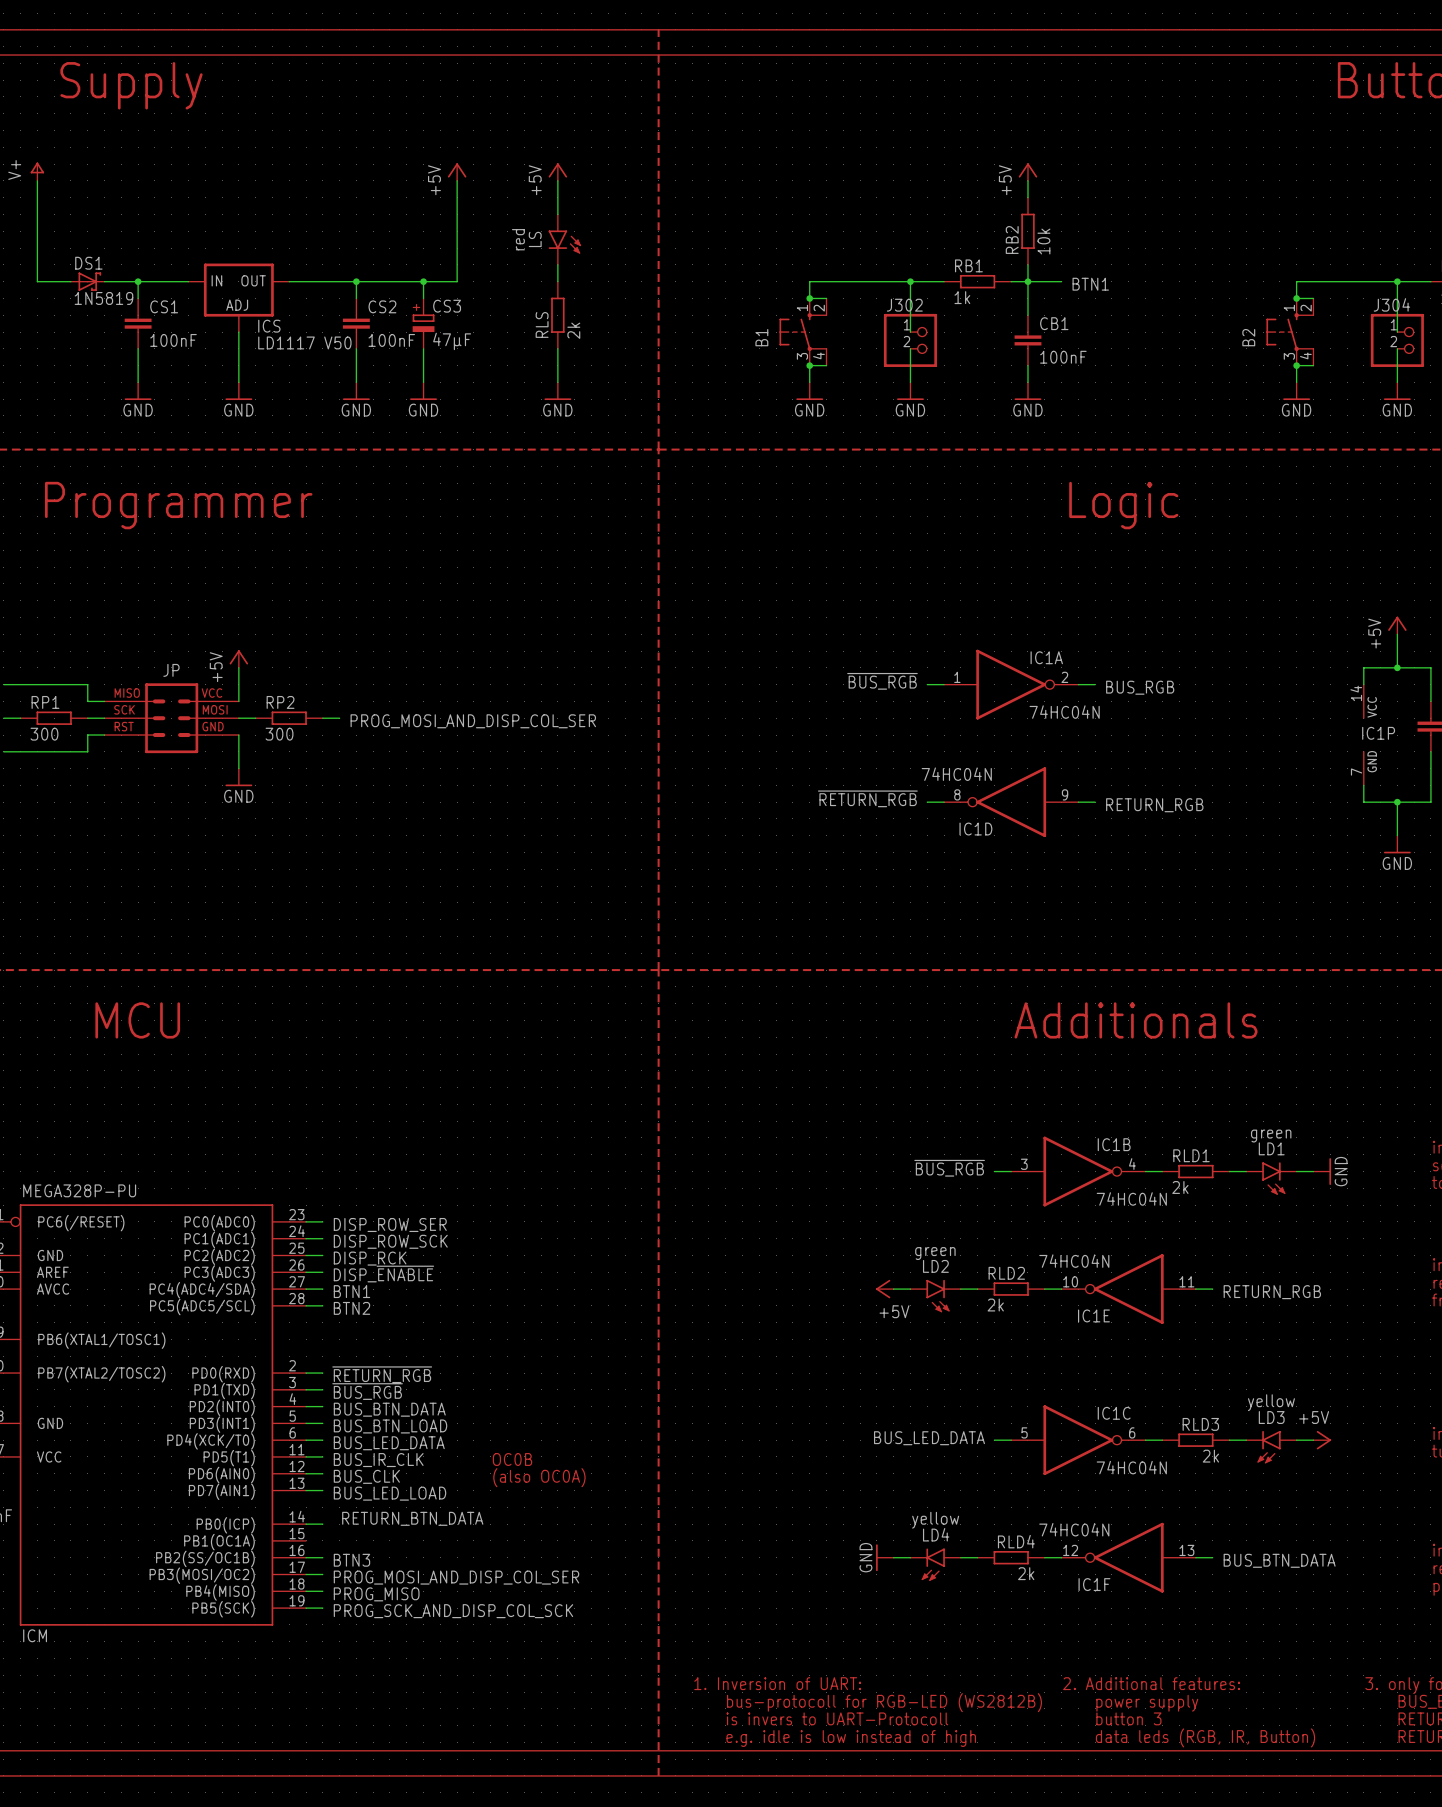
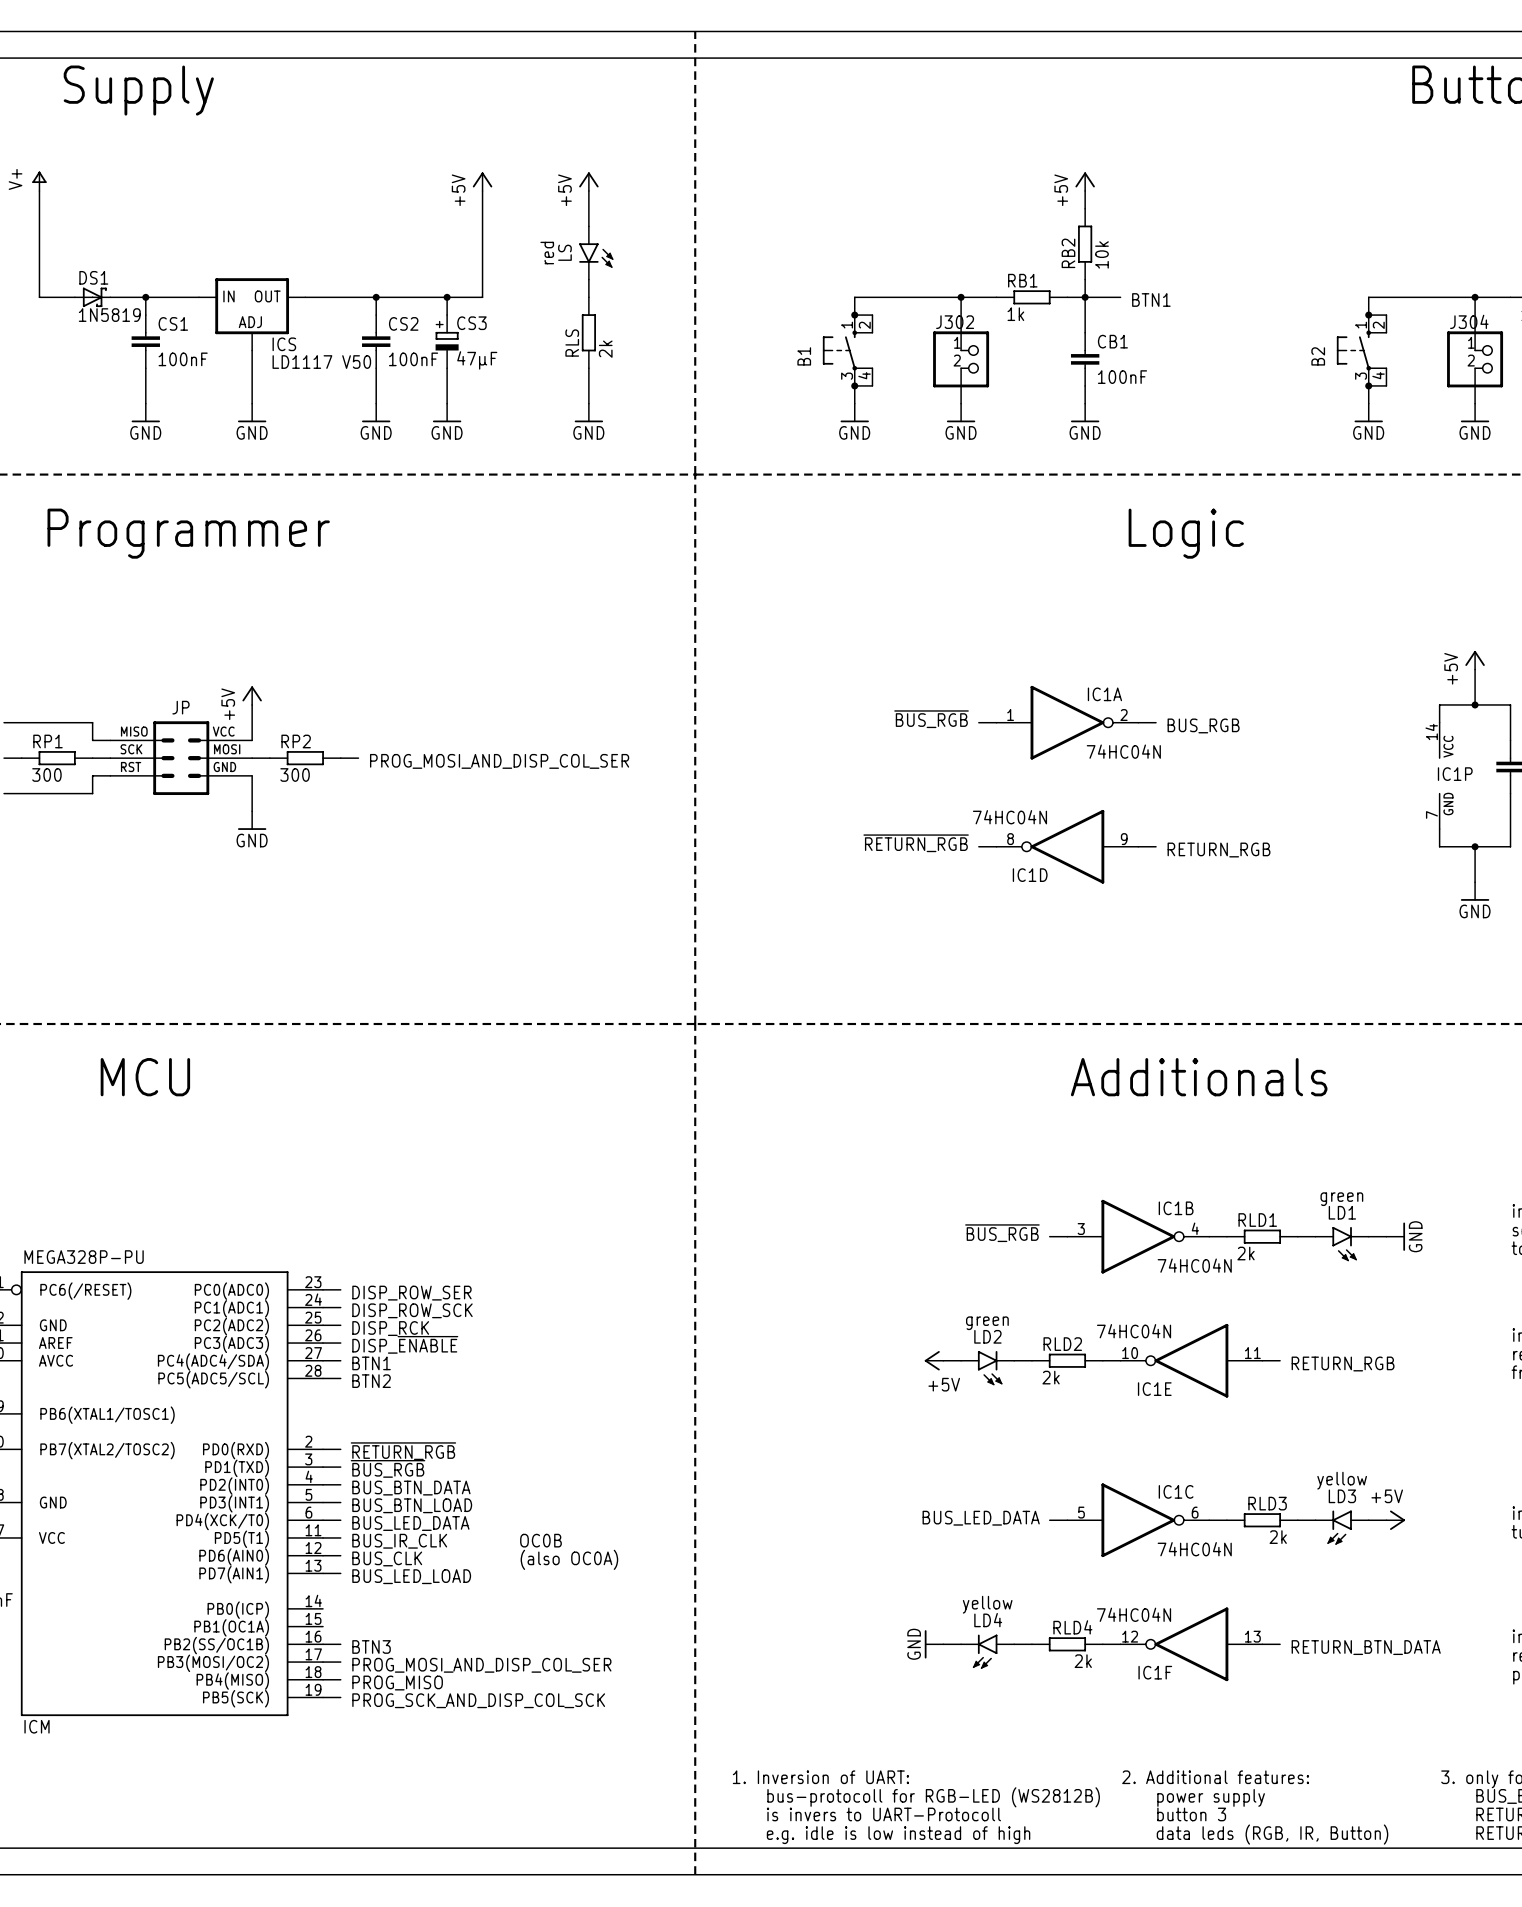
label: RETURN_BTN_DATA (412, 1518) -> none
wire: (306, 1524) (322, 1524) -> none
label: BUS_BTN_DATA (1279, 1560) -> RETURN_BTN_DATA (1366, 1647)

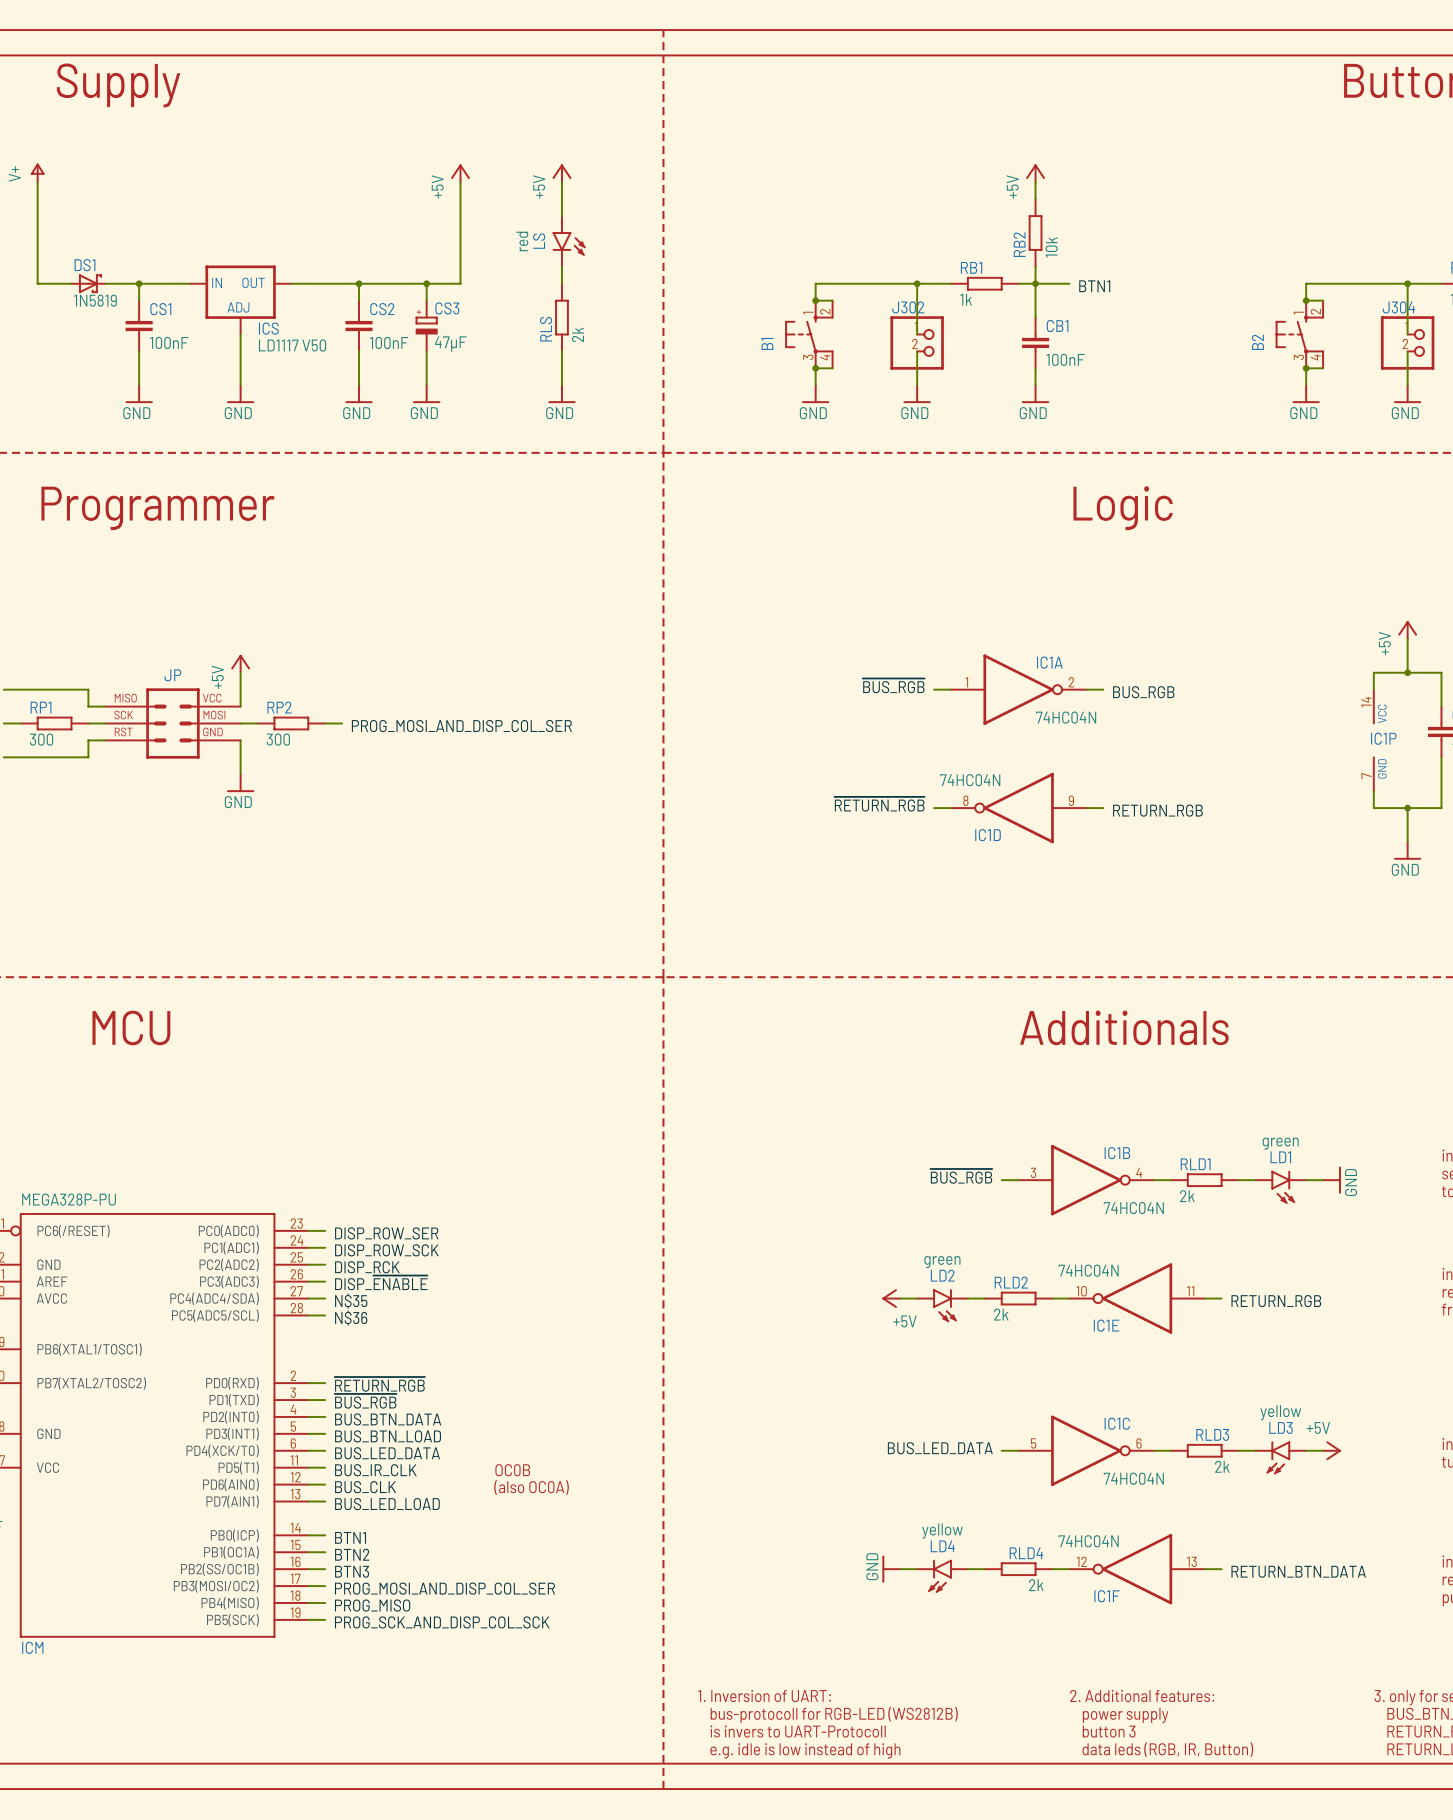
label: BTN1 (371, 1363) -> N$35 (351, 1301)
label: BTN2 (371, 1381) -> N$36 (351, 1317)
wire: none -> (308, 1535) (325, 1535)
label: none -> BTN1 (350, 1537)
wire: none -> (308, 1552) (325, 1552)
label: none -> BTN2 (352, 1554)

